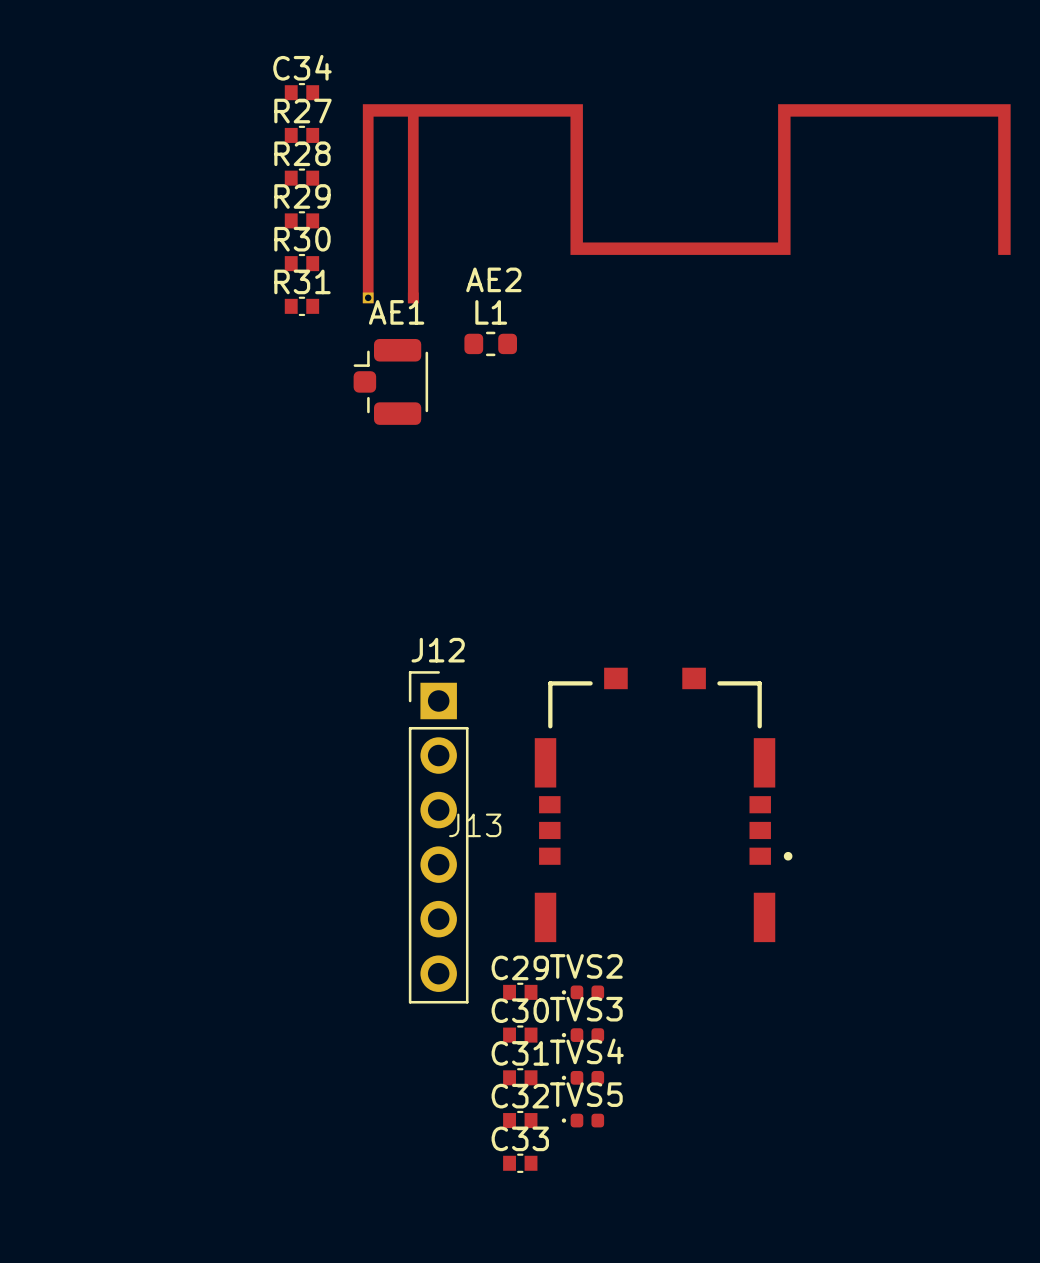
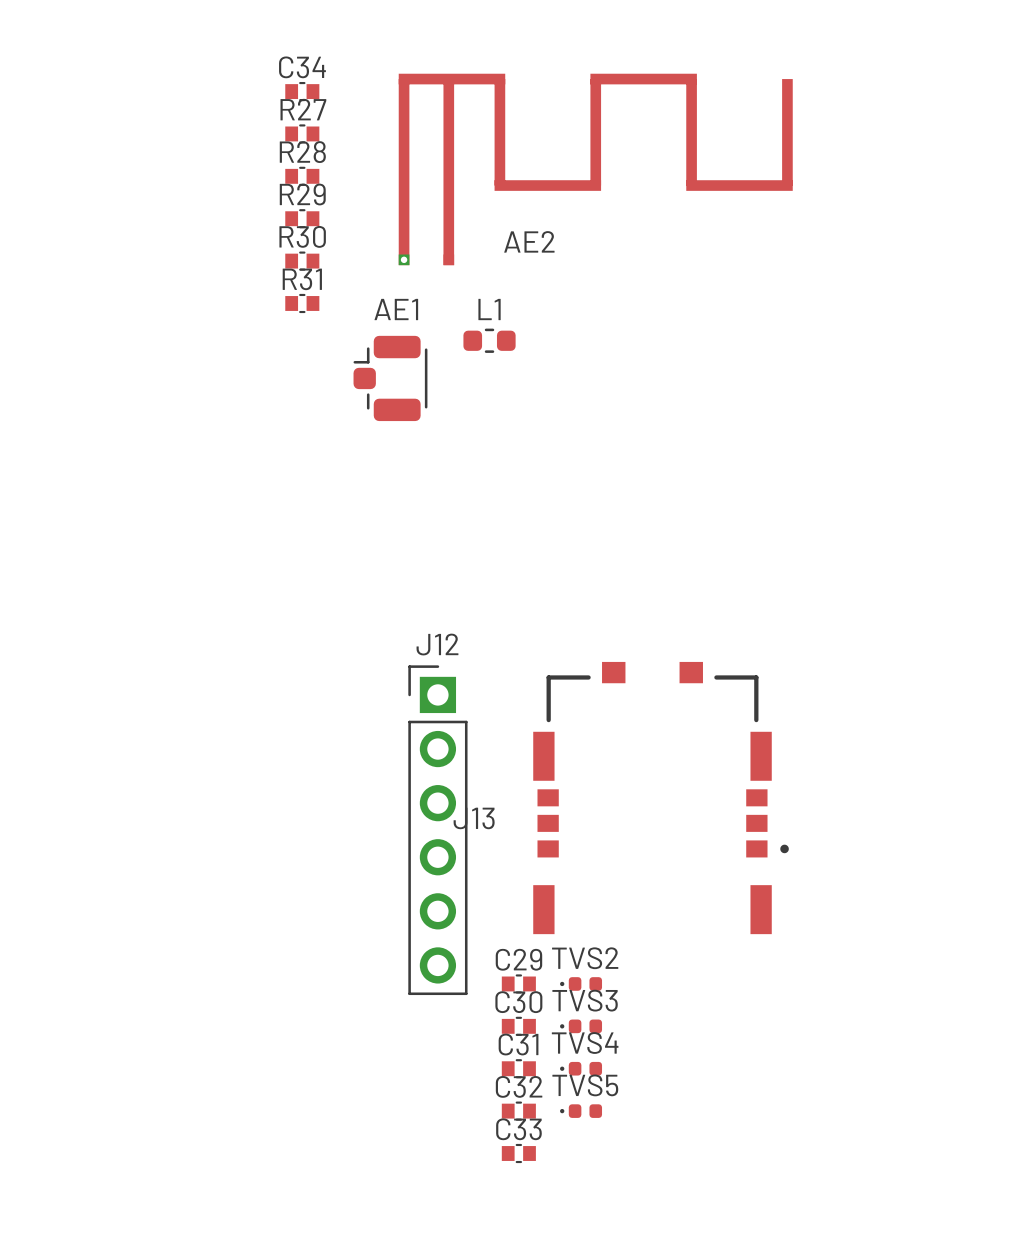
AE2 footprint: [362, 104, 1011, 304] -> [398, 73, 793, 266]
AE2 name position: AE2 (493, 279) -> AE2 (529, 241)

